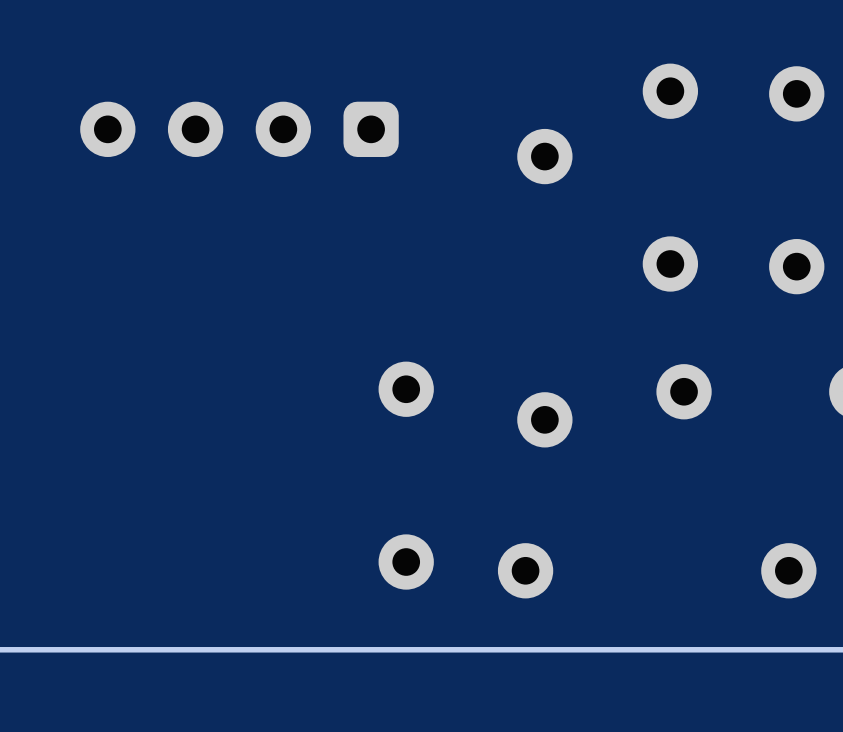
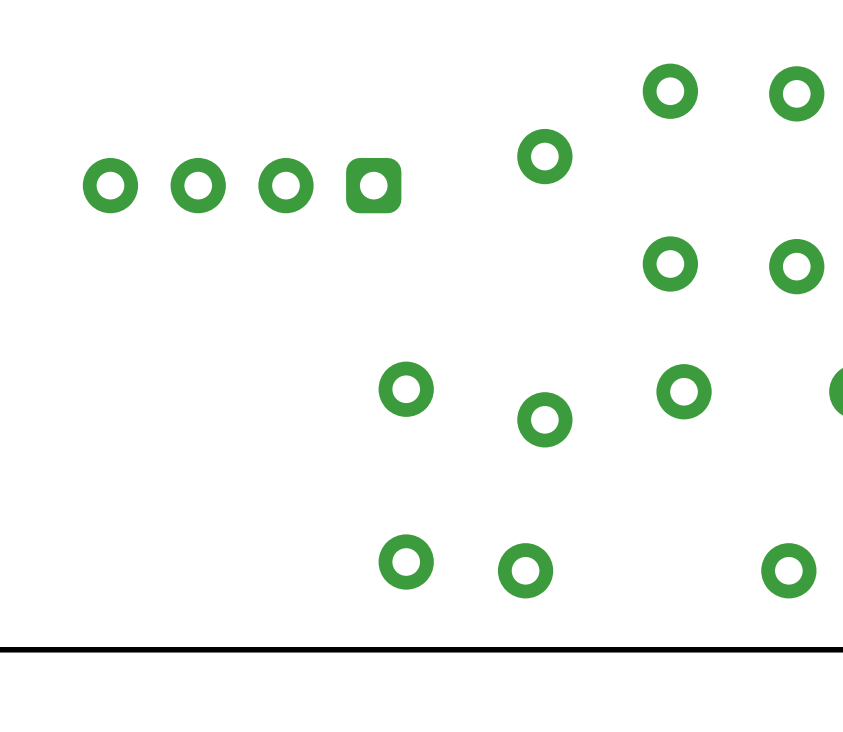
part position: (239, 129) -> (242, 185)

